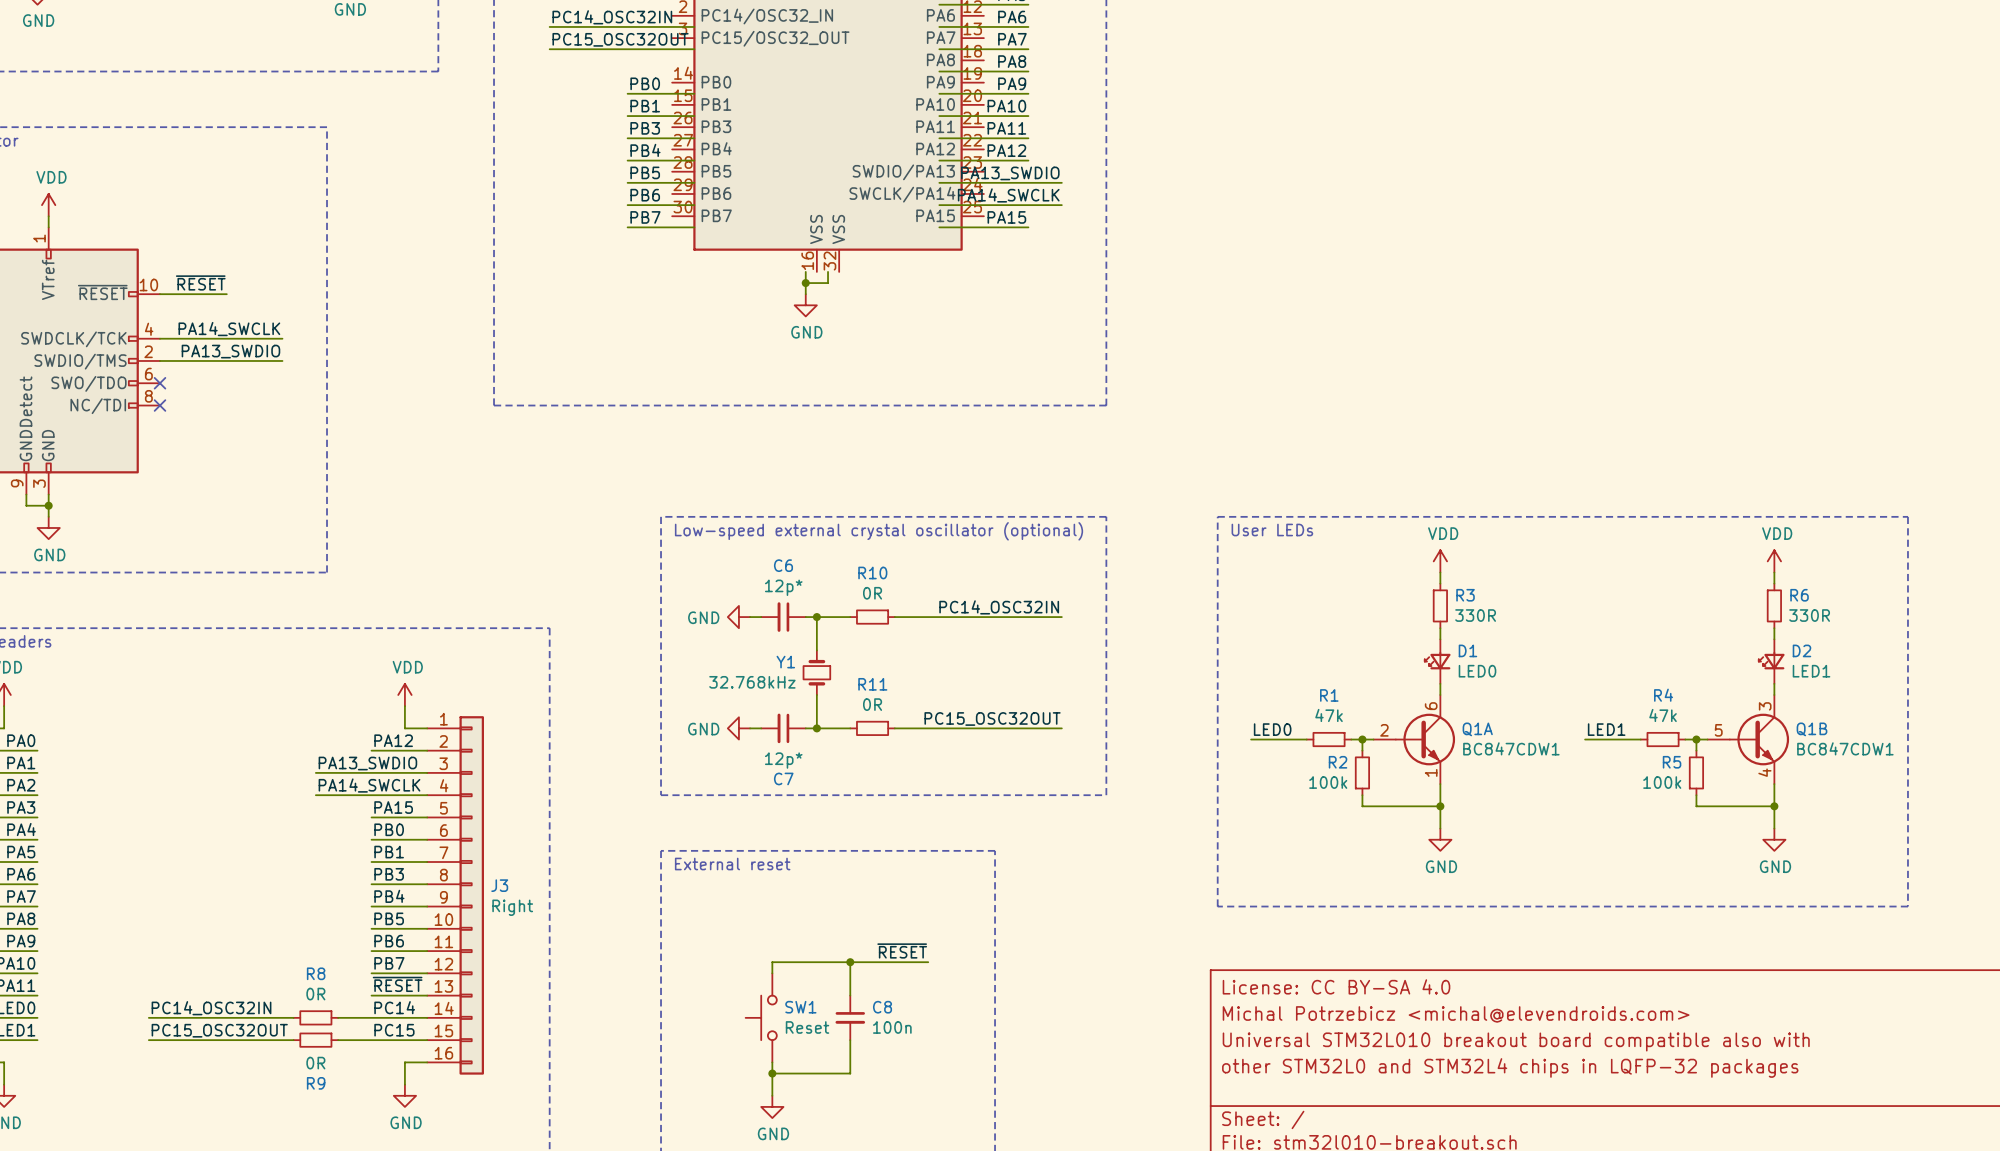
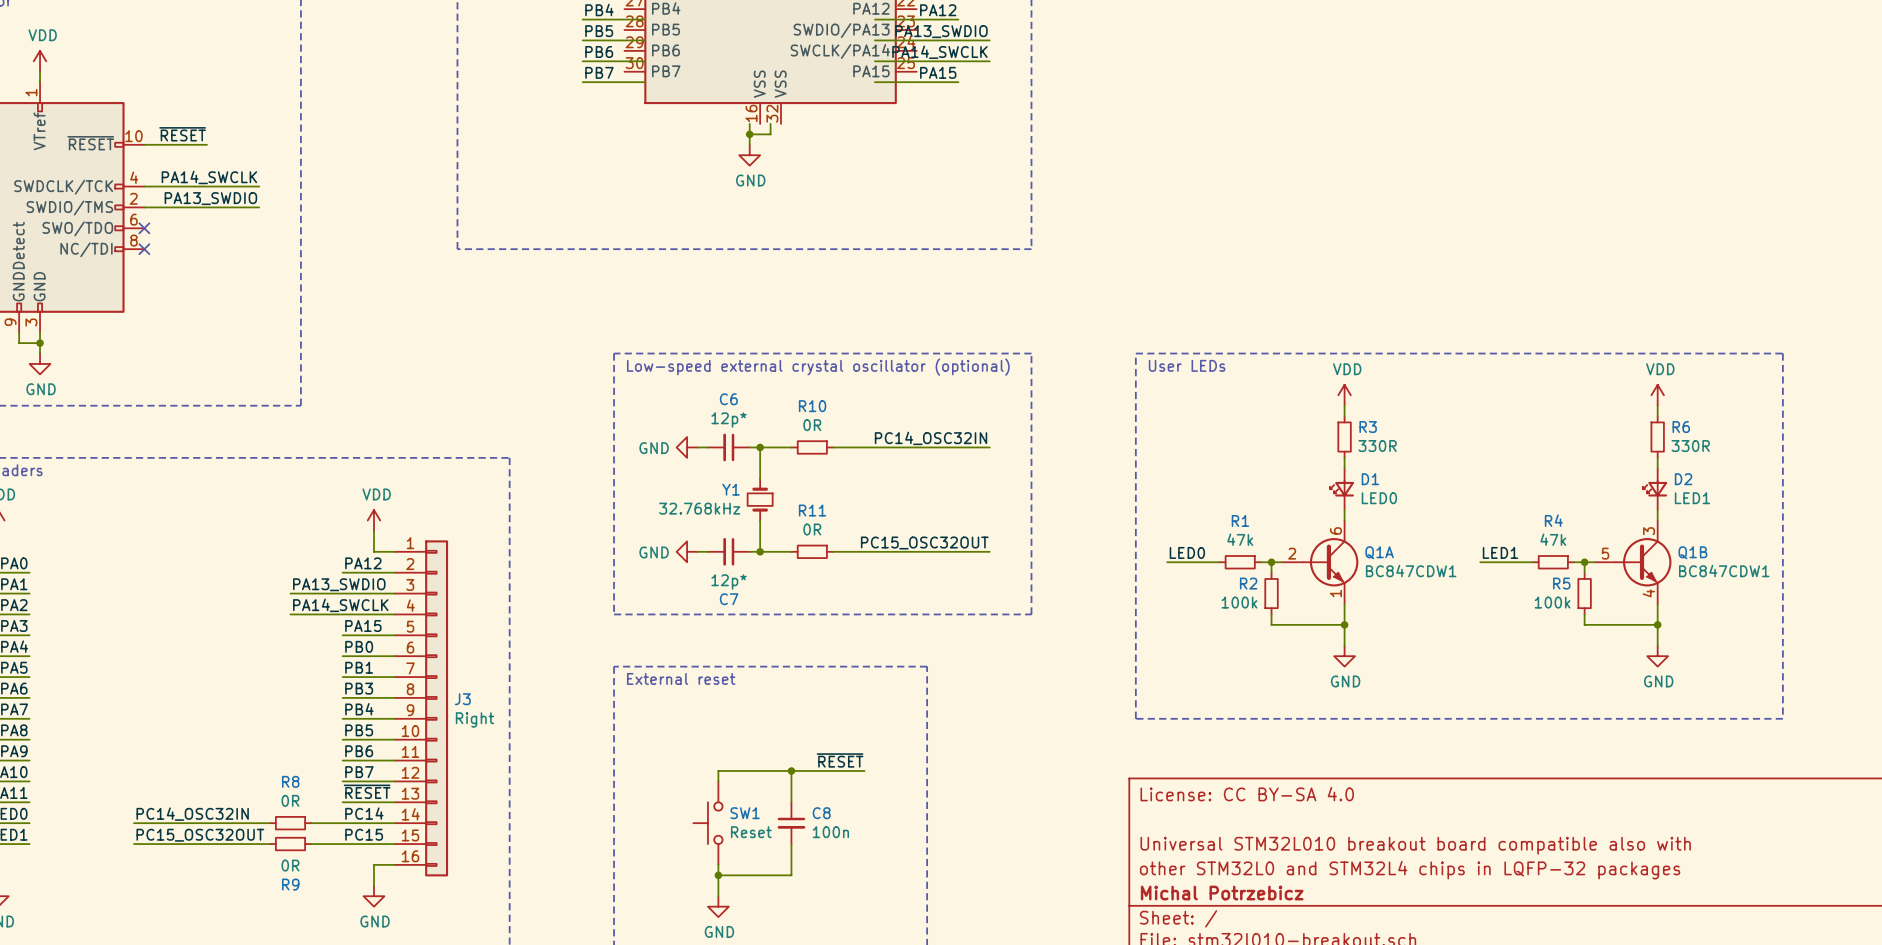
title block: Michal Potrzebicz <michal@elevendroids.com> (1456, 1014) -> none
title block: none -> Michal Potrzebicz (1222, 893)

